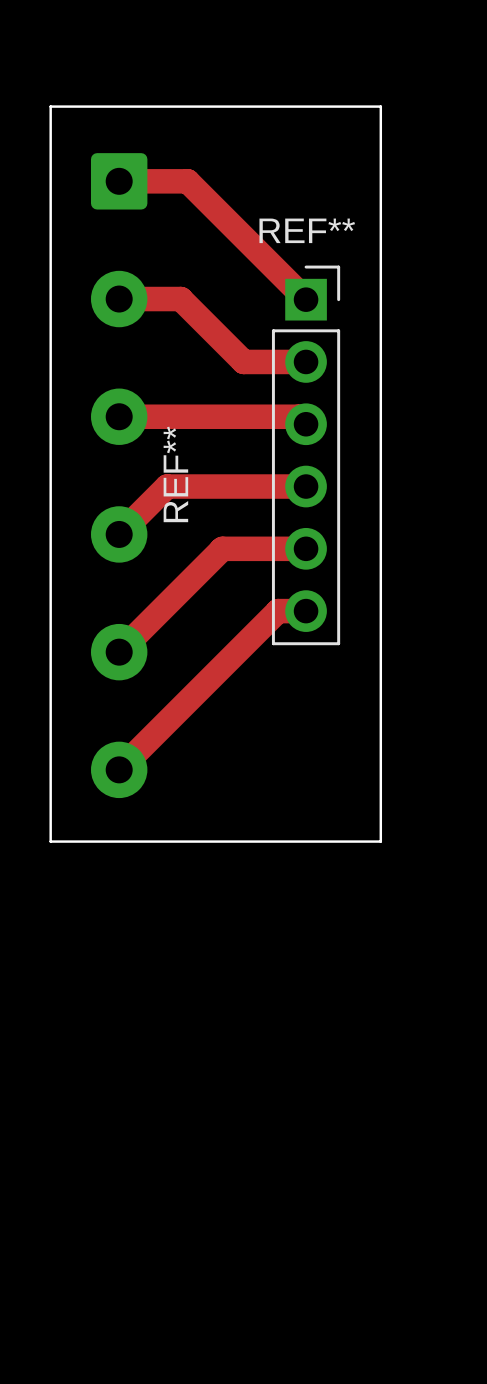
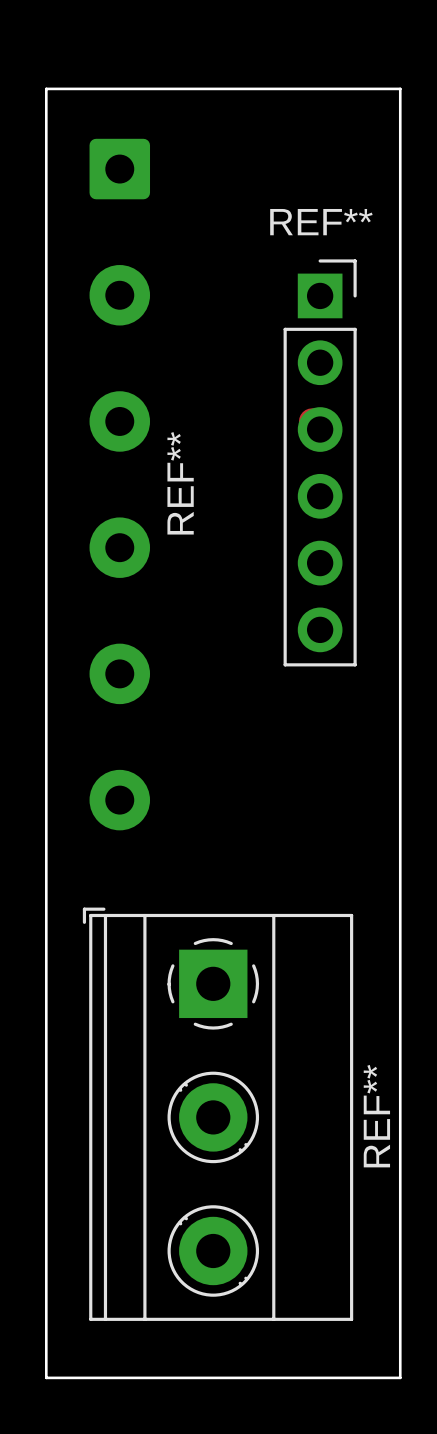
track: (119, 181) (187, 181) (306, 299) -> none
track: (119, 299) (180, 299) (243, 361) (306, 361) -> none
track: (119, 416) (298, 416) -> none
track: (306, 486) (167, 486) (119, 534) -> none
track: (306, 548) (222, 548) (119, 652) -> none
track: (306, 611) (277, 611) (119, 769) -> none
board edge: (50, 841) (380, 841) -> (46, 876) (46, 1377) (400, 1377) (400, 876)
REF**: none -> (218, 1114)

